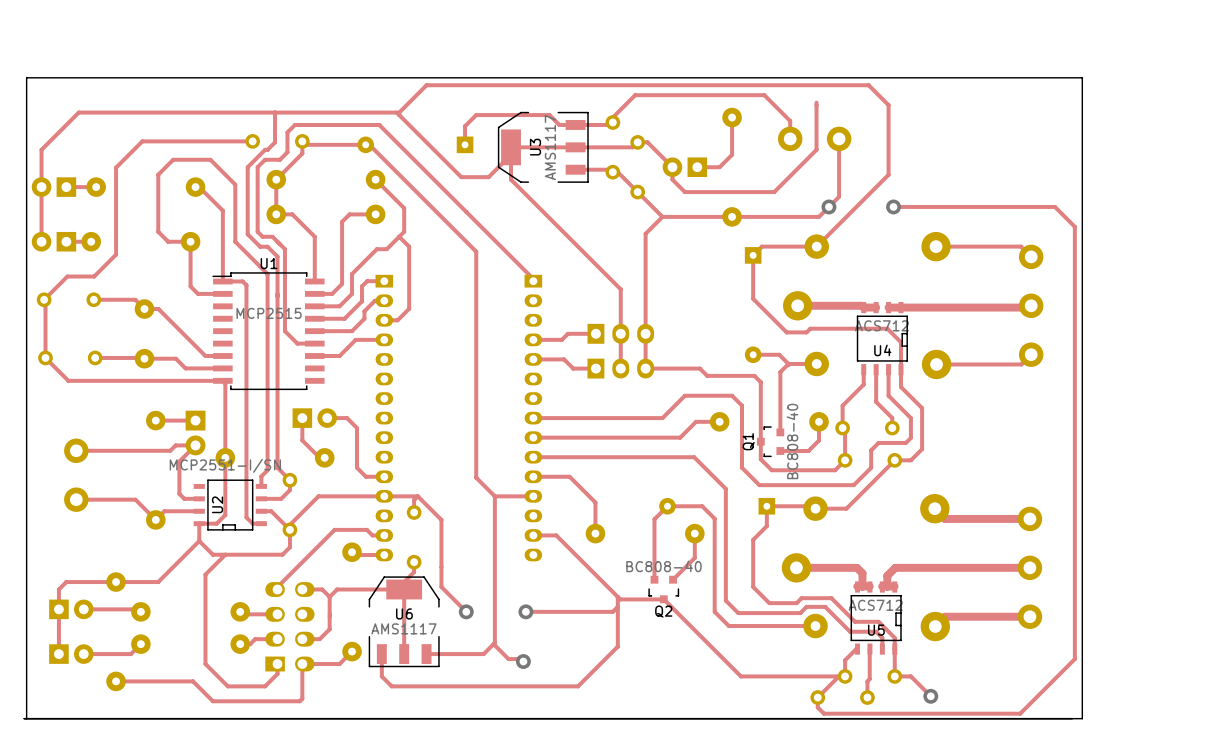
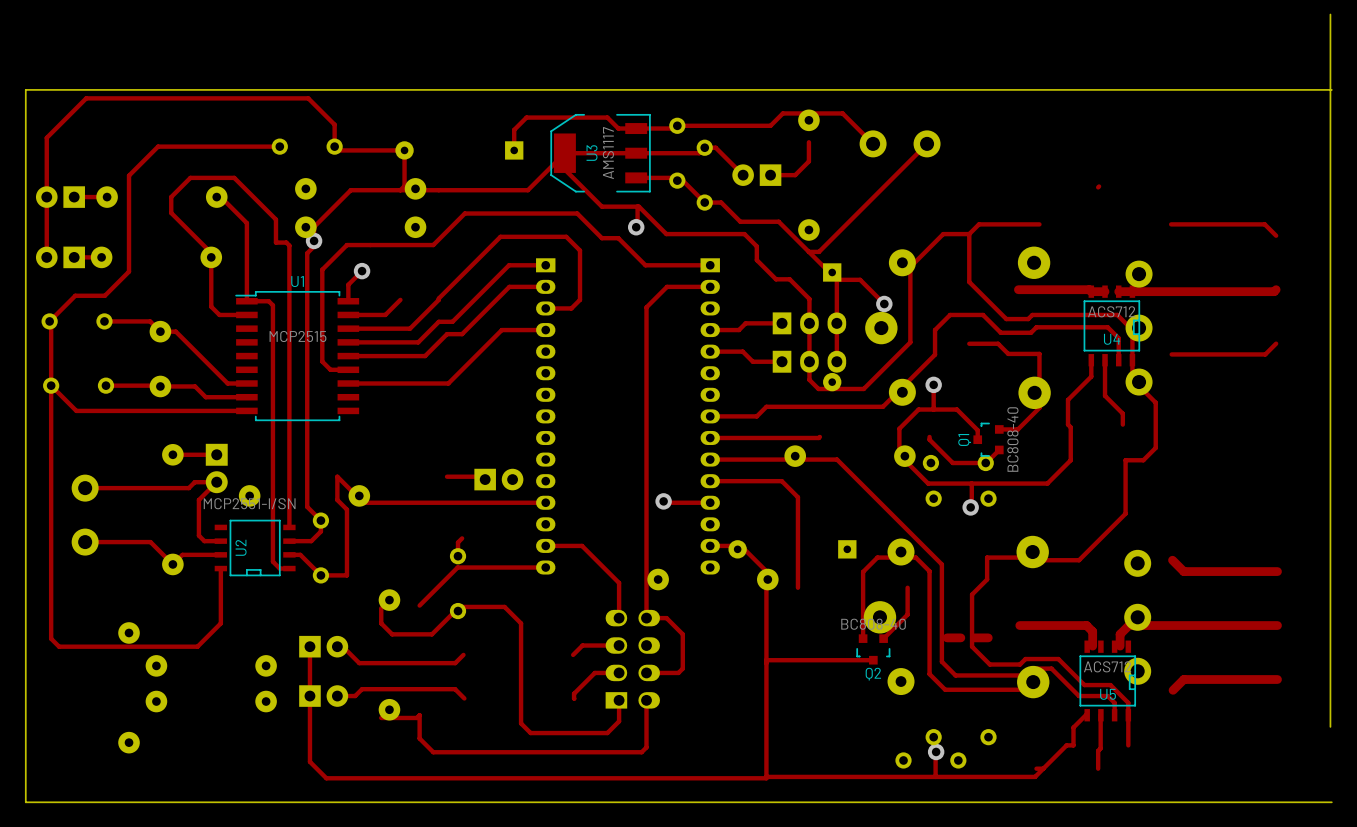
board edge: none -> (1330, 14) (1330, 726)
board edge: none -> (1331, 89) (25, 89) (25, 802) (1331, 802)
track: (816, 102) (816, 149) (774, 192) (684, 192) (672, 179) (672, 167) -> none
track: (275, 112) (275, 142) (247, 167) (247, 234) (260, 246) (267, 246) (277, 256) -> (564, 153) (527, 190) (350, 190) (314, 226) (314, 246) (307, 253) (307, 273)
track: (399, 115) (399, 112) (426, 85) (868, 85) (888, 105) (888, 174) (816, 246) (761, 246) (753, 255) (753, 298) (786, 332) (806, 332) (810, 328) (887, 328) (900, 342) (900, 387) (922, 408) (922, 449) (910, 460) (894, 460) (846, 508) (766, 506) (766, 526) (753, 539) (753, 587) (769, 603) (796, 603) (801, 598) (831, 598) (855, 621) (878, 621) (894, 637) (894, 676) (910, 676) (930, 696) -> none
track: (732, 117) (732, 137) -> none
track: (612, 122) (612, 117) (635, 95) (764, 95) (790, 121) (790, 138) -> (677, 125) (770, 125) (782, 113) (842, 113) (873, 143)
track: (839, 138) (839, 196) (819, 216) (662, 216) -> (927, 143) (819, 251) (808, 251)
track: (302, 141) (302, 153) (276, 179) (276, 214) (292, 214) (314, 236) (314, 266) -> (362, 271) (348, 284)
track: (365, 144) (369, 144) (476, 251) (476, 477) (494, 496) -> (404, 150) (404, 186) (400, 190)
track: (41, 149) (78, 112) (396, 112) (461, 177) (488, 177) (511, 154) -> (46, 155) (46, 137) (86, 98) (308, 98) (334, 124) (334, 146)
track: (511, 162) (511, 179) (620, 289) (620, 368) -> (564, 169) (601, 206) (638, 206) (666, 234) (744, 234) (756, 246) (756, 260) (776, 279) (789, 279) (809, 299) (809, 379) (818, 388) (863, 388) (910, 342) (910, 266) (943, 234) (969, 234)
track: none -> (1099, 186) (1098, 187)
track: (374, 179) (404, 208) (404, 231) (386, 249) (376, 249) (352, 274) (352, 293) (339, 306) -> (545, 308) (571, 308) (580, 299) (580, 250) (566, 236) (500, 236) (410, 328) (375, 328)
track: (637, 192) (662, 216) -> (704, 202) (721, 202) (740, 221) (778, 221) (836, 279)
track: none -> (637, 206) (636, 227)
via: (828, 206) -> none
track: (893, 206) (1054, 206) (1074, 226) (1074, 659) (1020, 713) (823, 713) (817, 707) (817, 697) (838, 676) -> none
via: (893, 206) -> none
track: none -> (1039, 224) (978, 224) (969, 234)
track: (375, 214) (349, 214) (342, 221) (342, 283) (332, 293) -> (400, 299) (385, 314) (367, 314)
via: none -> (636, 227)
track: (662, 216) (645, 233) (645, 368) (699, 368) (707, 375) (754, 375) (760, 382) (760, 459) (771, 470) (835, 470) (845, 460) (842, 405) (863, 384) (863, 369) -> none
track: none -> (969, 234) (969, 282) (1006, 319) (1028, 319) (1032, 314) (1117, 314) (1132, 330) (1132, 379) (1155, 402) (1155, 447) (1143, 460) (1125, 460) (1125, 513) (1079, 560) (987, 557) (987, 579) (972, 594) (972, 646) (989, 664) (1020, 664) (1025, 659) (1058, 659) (1084, 685) (1110, 685) (1128, 702) (1128, 745)
via: none -> (314, 240)
track: (399, 236) (409, 246) (409, 308) (397, 320) (384, 320) -> none
track: (190, 241) (168, 241) (158, 231) (158, 174) (173, 159) (210, 159) (235, 184) (235, 241) (267, 274) (267, 470) (261, 476) -> (211, 253) (171, 212) (171, 197) (190, 177) (234, 177) (275, 219) (275, 242) (286, 242) (289, 245) (289, 516)
track: (936, 246) (1020, 246) (1031, 256) -> (1171, 224) (1264, 224) (1276, 235)
via: none -> (362, 271)
track: none -> (836, 279) (860, 279) (884, 303)
track: none -> (836, 279) (836, 361)
track: none -> (710, 286) (667, 286) (646, 307) (646, 618) (666, 618) (682, 634) (682, 649)
track: (384, 281) (367, 281) (361, 286) (361, 301) (344, 318) -> (545, 265) (509, 265) (452, 321) (438, 321) (418, 342) (381, 342)
track: (533, 281) (533, 279) (379, 124) (294, 124) (287, 132) (287, 152) (280, 159) (265, 159) (257, 167) (257, 231) (262, 236) (272, 236) (284, 249) (284, 331) (298, 343) -> (710, 265) (645, 265) (618, 238) (601, 238) (577, 213) (464, 213) (433, 245) (346, 245) (322, 269) (322, 361) (330, 369)
via: none -> (884, 303)
track: (384, 300) (374, 300) (364, 311) (364, 318) (352, 331) -> (545, 286) (509, 286) (462, 334) (447, 334) (425, 356) (389, 356)
track: none -> (782, 323) (745, 323) (739, 330) (710, 330)
part: none -> (809, 323)
track: (797, 305) (876, 307) -> (1018, 289) (1089, 289) (1091, 291) (1105, 291)
track: (1031, 305) (1029, 307) (888, 307) -> (1276, 289) (1274, 291) (1118, 291)
track: none -> (969, 343) (998, 343) (1008, 353) (1039, 353) (1039, 407) (1017, 429) (999, 429)
track: none -> (710, 351) (742, 351) (752, 361) (782, 361)
track: (595, 333) (567, 333) (561, 339) (533, 339) -> none
part: (620, 333) -> none
track: none -> (1091, 360) (1091, 376) (1068, 399) (1070, 460) (1047, 483) (928, 483) (899, 454) (899, 428) (918, 409) (956, 409) (977, 430) (977, 439)
track: none -> (1118, 360) (1118, 338) (1107, 327) (1036, 327) (1031, 332) (1000, 332) (983, 314) (950, 314) (935, 330) (935, 354) (882, 406) (766, 406) (756, 416) (710, 416)
part: none -> (809, 361)
U4 position: (882, 338) -> (1111, 325)
track: (384, 339) (355, 339) (339, 356) -> (545, 330) (501, 330) (448, 383) (375, 383)
track: (753, 354) (779, 354) (788, 363) -> none
track: (1031, 354) (1021, 364) (936, 364) -> (1276, 343) (1265, 354) (1171, 354)
track: none -> (51, 385) (51, 638) (59, 646) (197, 646) (220, 623) (220, 587)
track: none -> (933, 384) (933, 409)
via: none -> (933, 384)
track: (533, 359) (564, 359) (573, 368) (595, 368) -> none
track: (788, 363) (780, 372) (780, 432) -> none
track: (788, 363) (816, 363) -> none
part: (620, 368) -> none
track: (876, 369) (876, 401) (892, 418) (892, 428) -> (1105, 360) (1105, 395) (1122, 413) (1122, 424)
track: (888, 369) (888, 395) (910, 418) (910, 437) (905, 442) (878, 442) (871, 450) (871, 467) (853, 485) (759, 485) (742, 467) (742, 405) (732, 395) (684, 395) (662, 418) (533, 418) -> none
track: (222, 380) (225, 383) (225, 514) (216, 523) (199, 523) -> none
part: none -> (710, 416)
track: none -> (819, 436) (710, 437)
track: none -> (929, 436) (929, 439) (952, 463) (986, 463) (999, 449)
track: (302, 418) (302, 440) (319, 457) (324, 457) -> none
part: (314, 418) -> none
track: (327, 418) (347, 418) (357, 428) (357, 467) (366, 476) (384, 476) -> none
part: (384, 418) -> none
part position: (533, 418) -> (545, 416)
track: (719, 421) (696, 421) (680, 437) (533, 437) -> none
track: (819, 421) (819, 440) (808, 450) (780, 450) -> none
track: none -> (710, 459) (837, 459) (941, 564) (941, 661) (955, 675) (1024, 675) (1031, 668) (1051, 668) (1078, 696) (1107, 696) (1114, 702) (1114, 715)
track: none -> (447, 476) (482, 476) (485, 479)
Q1 position: (770, 441) -> (988, 439)
part: none -> (498, 479)
track: none -> (710, 481) (781, 481) (797, 497) (797, 587)
track: none -> (971, 483) (970, 507)
track: (533, 457) (694, 457) (725, 488) (725, 600) (738, 613) (800, 613) (806, 606) (825, 606) (850, 631) (876, 631) (882, 637) (882, 649) -> none
track: none -> (663, 501) (710, 502)
via: none -> (663, 501)
track: none -> (545, 502) (363, 502) (337, 476) (337, 500) (346, 509) (346, 575) (320, 575)
via: none -> (970, 507)
track: (533, 476) (569, 476) (595, 502) (595, 533) -> none
track: (494, 496) (494, 642) (483, 654) (426, 654) -> none
track: (494, 496) (533, 496) -> none
track: none -> (545, 545) (582, 545) (619, 582) (619, 618)
track: none -> (710, 545) (741, 545) (766, 571) (766, 778) (326, 778) (309, 761) (309, 646)
track: (934, 508) (945, 518) (1029, 518) -> (1172, 560) (1183, 571) (1277, 571)
track: none -> (545, 567) (457, 567) (419, 605)
track: (694, 533) (694, 557) (673, 579) -> (907, 587) (907, 614) (883, 638)
track: (384, 535) (372, 535) (366, 529) (334, 529) (277, 587) (277, 589) -> none
track: (533, 535) (556, 535) (620, 599) (663, 599) (740, 676) (845, 676) (845, 660) (857, 648) -> none
track: (352, 552) (354, 555) (384, 555) -> none
track: (225, 554) (205, 574) (205, 664) (227, 686) (265, 686) (277, 673) (277, 664) -> none
track: none -> (381, 608) (381, 623) (392, 634) (431, 634) (459, 606) (504, 606) (521, 623) (521, 723) (530, 733) (607, 733) (619, 721) (619, 700)
track: (414, 562) (414, 572) (404, 582) (404, 654) (401, 656) -> none
track: (796, 567) (856, 567) (862, 573) (862, 586) -> (1019, 625) (1086, 625) (1092, 631) (1092, 646)
track: (1029, 567) (895, 567) (887, 575) (887, 586) -> (1277, 625) (1128, 625) (1120, 634) (1120, 646)
track: (654, 579) (654, 519) (667, 506) (702, 506) (714, 518) (714, 611) (728, 626) (815, 626) -> (863, 638) (863, 571) (877, 557) (915, 557) (929, 571) (929, 674) (945, 689) (1040, 689)
track: (302, 589) (322, 589) (329, 596) -> none
track: (404, 589) (337, 589) (329, 596) -> none
Q2 position: (663, 589) -> (873, 649)
track: none -> (619, 645) (582, 645) (573, 654)
part: none -> (323, 646)
track: none -> (337, 646) (342, 646) (359, 663) (455, 663) (463, 654)
track: (329, 596) (329, 629) (319, 639) -> (464, 698) (455, 689) (362, 689) (353, 696)
part: none -> (632, 659)
track: (617, 606) (612, 611) (525, 611) -> none
track: none -> (766, 660) (873, 660)
part: (71, 609) -> none
track: (83, 609) (138, 609) (140, 611) -> none
track: (240, 611) (242, 614) (277, 614) -> none
track: (466, 611) (441, 587) (441, 519) (417, 496) (318, 496) (289, 524) (289, 547) (282, 554) (212, 554) (199, 541) (158, 582) (66, 582) (58, 589) (58, 654) -> none
via: (466, 611) -> none
via: (525, 611) -> none
track: (617, 614) (617, 646) (578, 686) (391, 686) (381, 676) (381, 654) -> (682, 668) (678, 672) (646, 672)
track: (1029, 616) (945, 616) (935, 626) -> (1277, 679) (1183, 679) (1173, 690)
track: none -> (619, 672) (594, 672) (574, 693) (574, 698)
U5 position: (876, 618) -> (1107, 680)
U6: AMS1117 (404, 621) -> none
part: (289, 626) -> none
track: (277, 639) (255, 639) (250, 644) (240, 644) -> none
part: none -> (323, 696)
track: none -> (646, 700) (646, 747) (641, 752) (433, 752) (419, 738) (419, 715) (416, 717) (381, 717)
track: (140, 644) (130, 654) (83, 654) -> none
track: (493, 644) (508, 659) (520, 659) (523, 661) -> none
track: (869, 648) (867, 697) -> (1100, 714) (1100, 748) (1098, 750) (1098, 768)
track: (352, 651) (339, 664) (302, 664) -> none
part: (71, 654) -> none
track: none -> (1086, 714) (1073, 727) (1073, 745) (1066, 745) (1035, 776) (766, 776)
via: (523, 661) -> none
track: (302, 664) (302, 698) (299, 701) (212, 701) (193, 681) (116, 681) -> none
track: none -> (936, 751) (935, 776)
via: none -> (936, 751)
via: (930, 696) -> none
track: none -> (1036, 768) (1043, 768)
board edge: (24, 718) (1082, 718) (1082, 77) (26, 77) (26, 718) -> none

